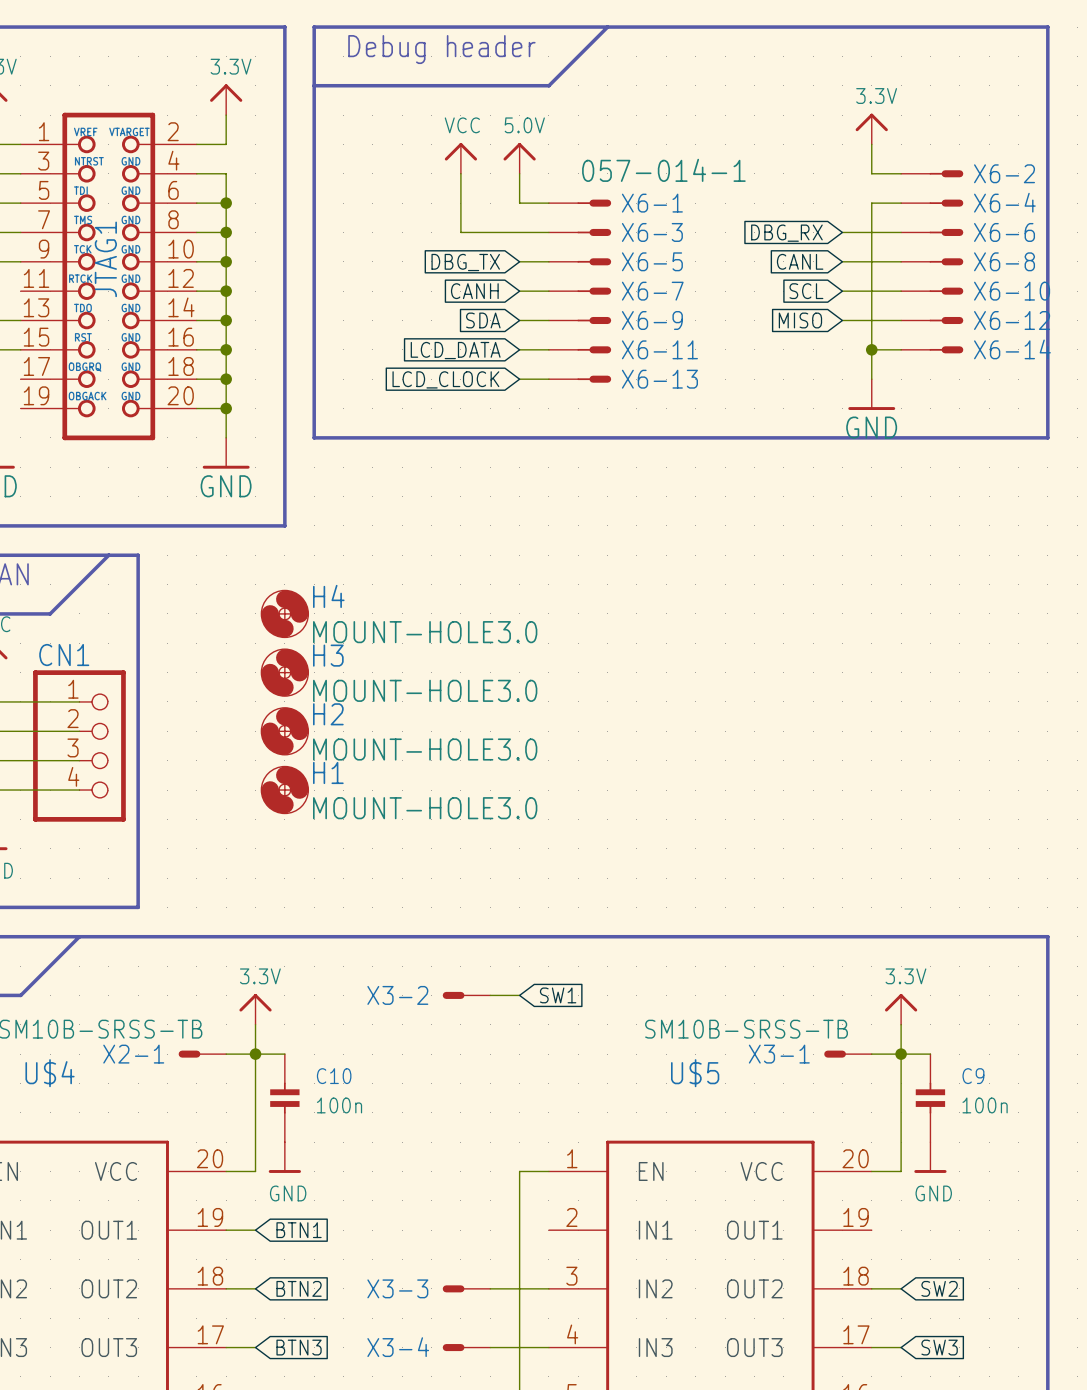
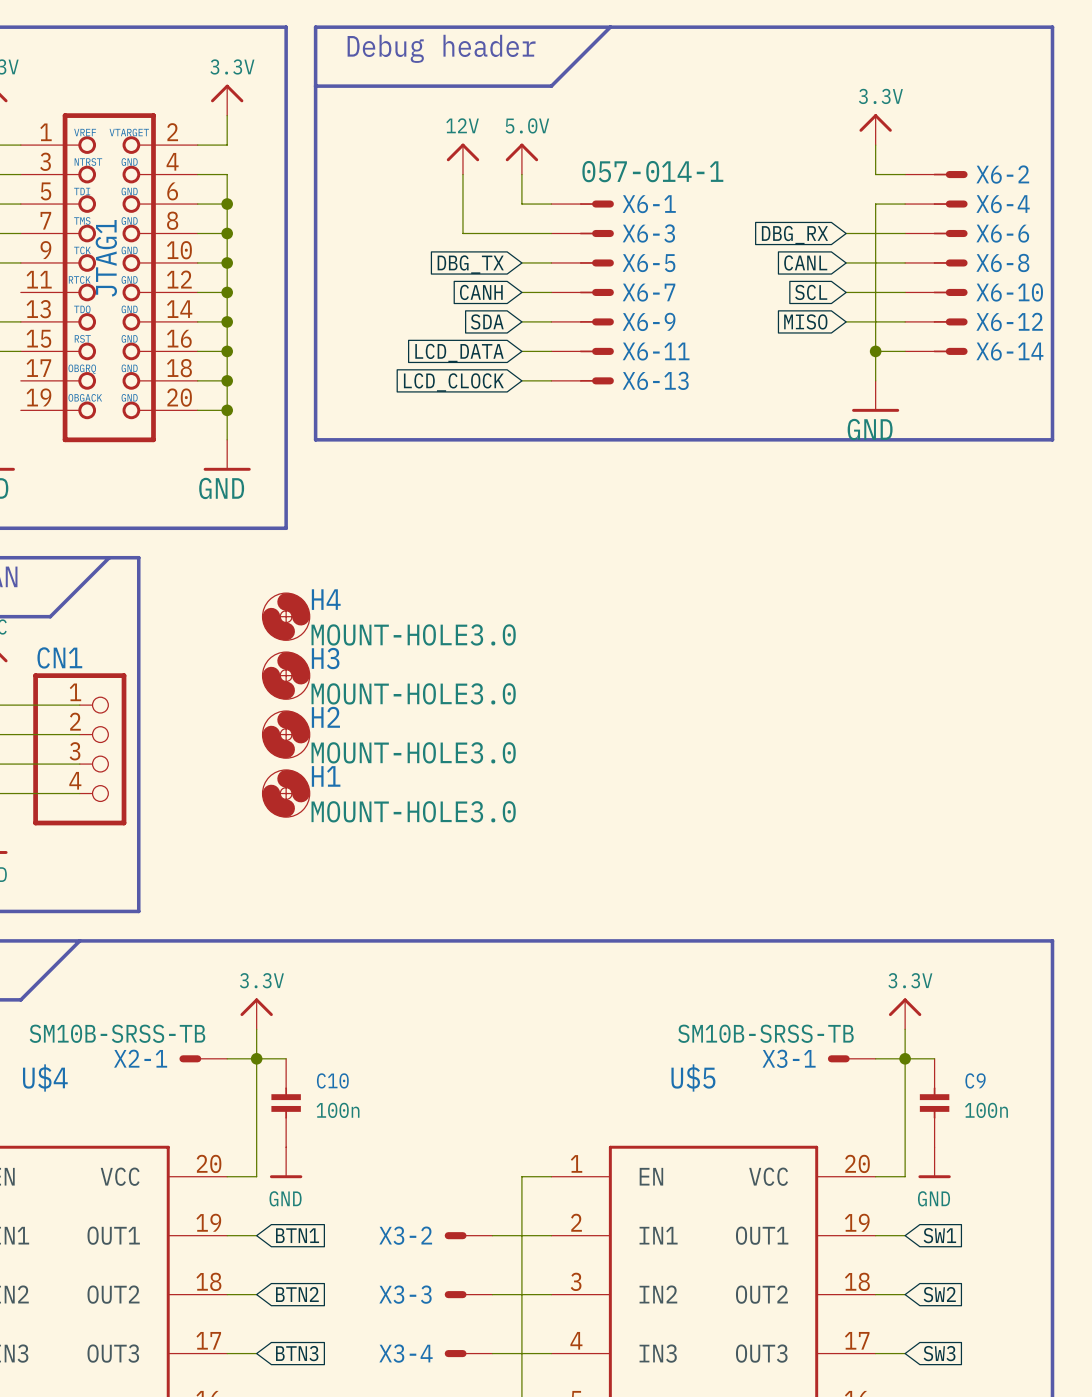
power symbol: VCC (460, 158) -> 12V (462, 159)
X3-2 position: (466, 995) -> (468, 1235)
wire: (490, 995) (519, 995) -> none
global label: SW1 (558, 995) -> none
wire: none -> (492, 1235) (551, 1235)
wire: none -> (875, 1235) (905, 1235)
global label: none -> SW1 (939, 1235)

